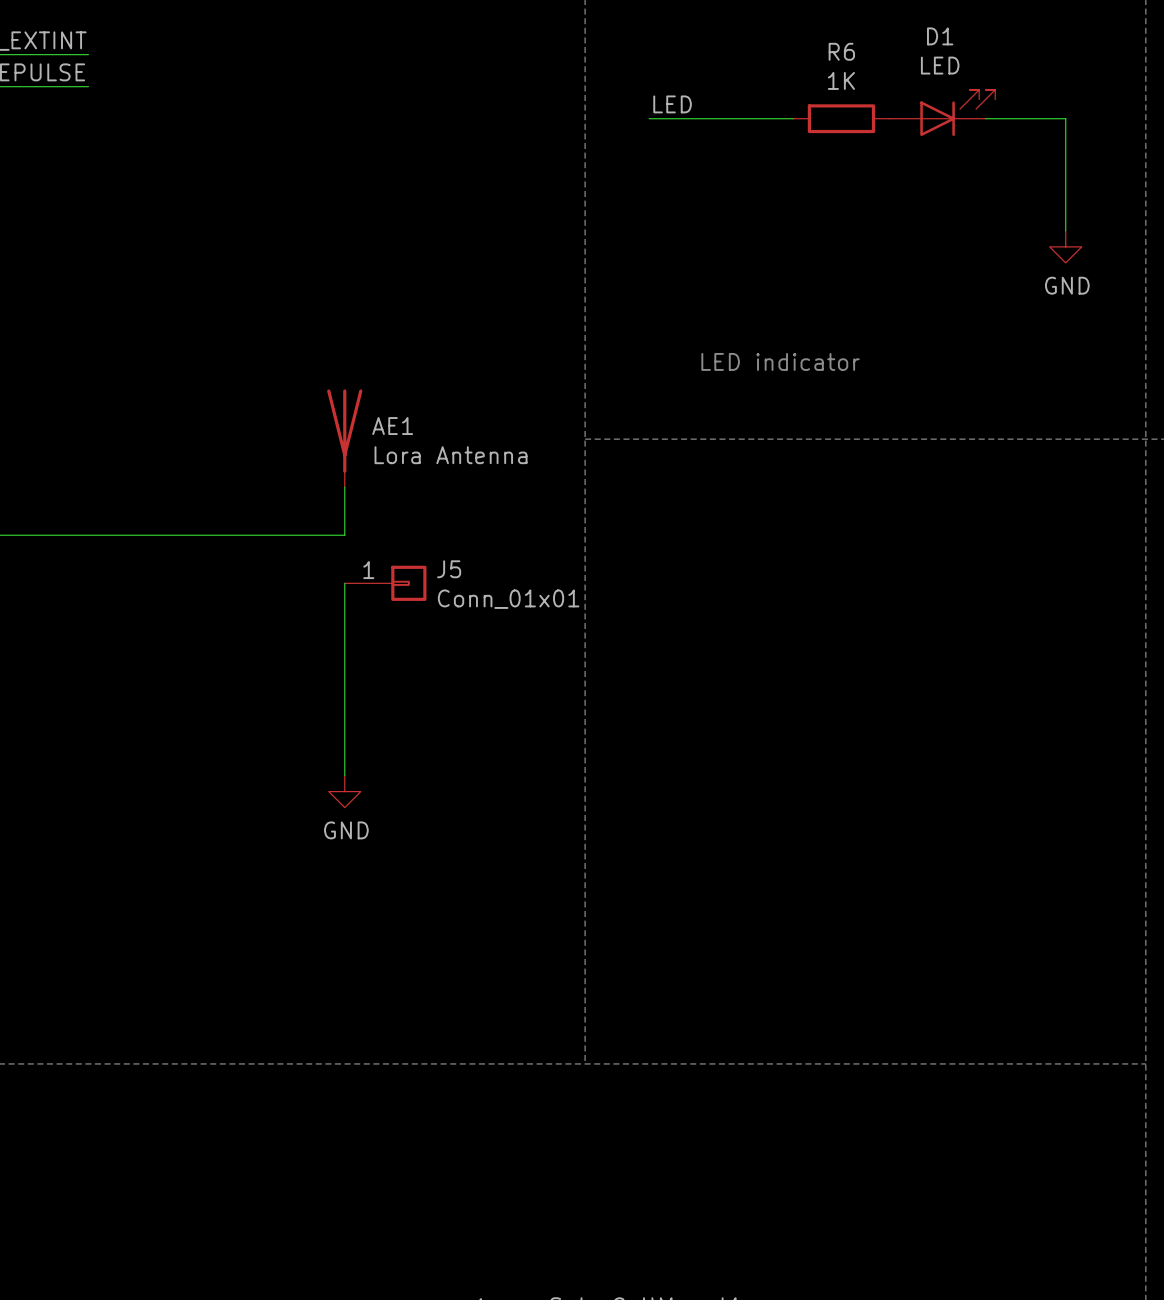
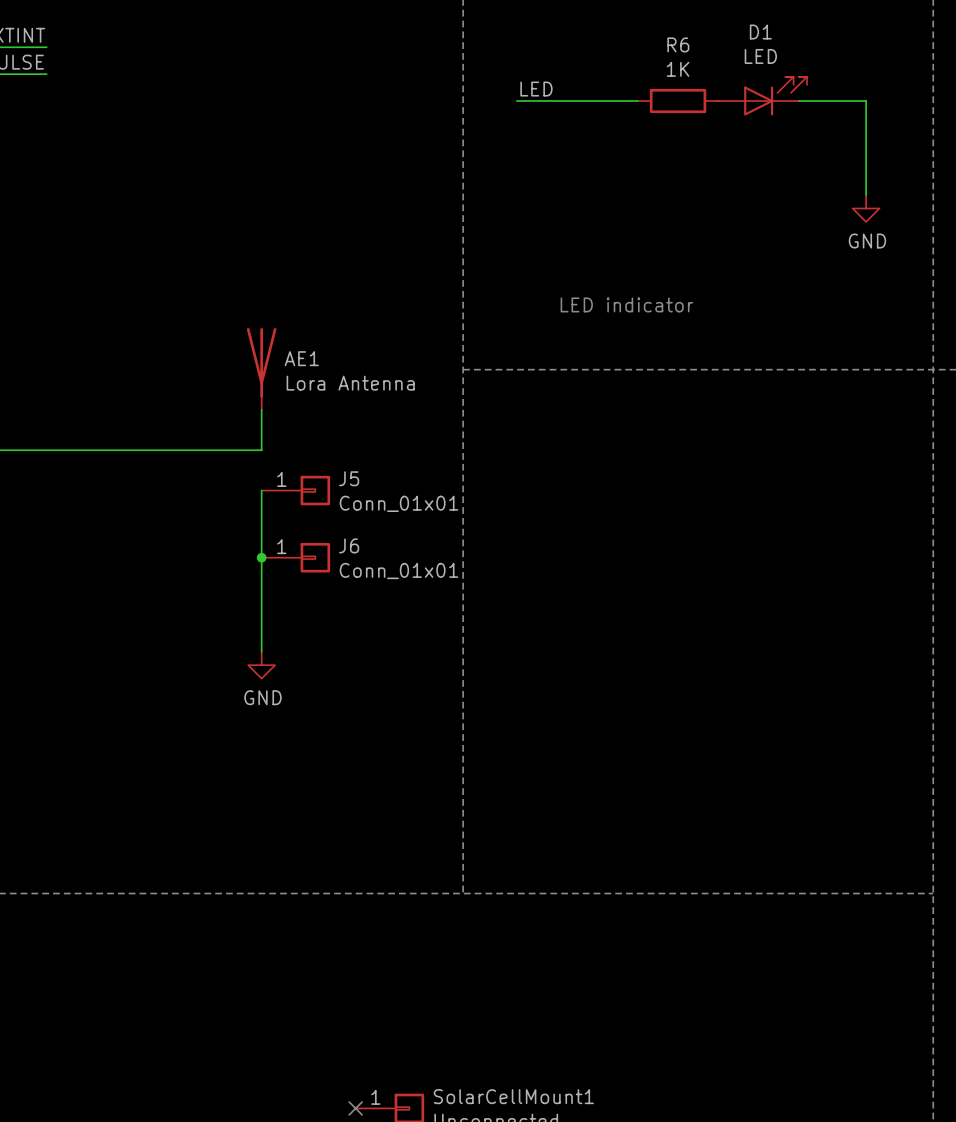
junction: none -> (261, 557)
J6: none -> Conn_01x01 (295, 557)

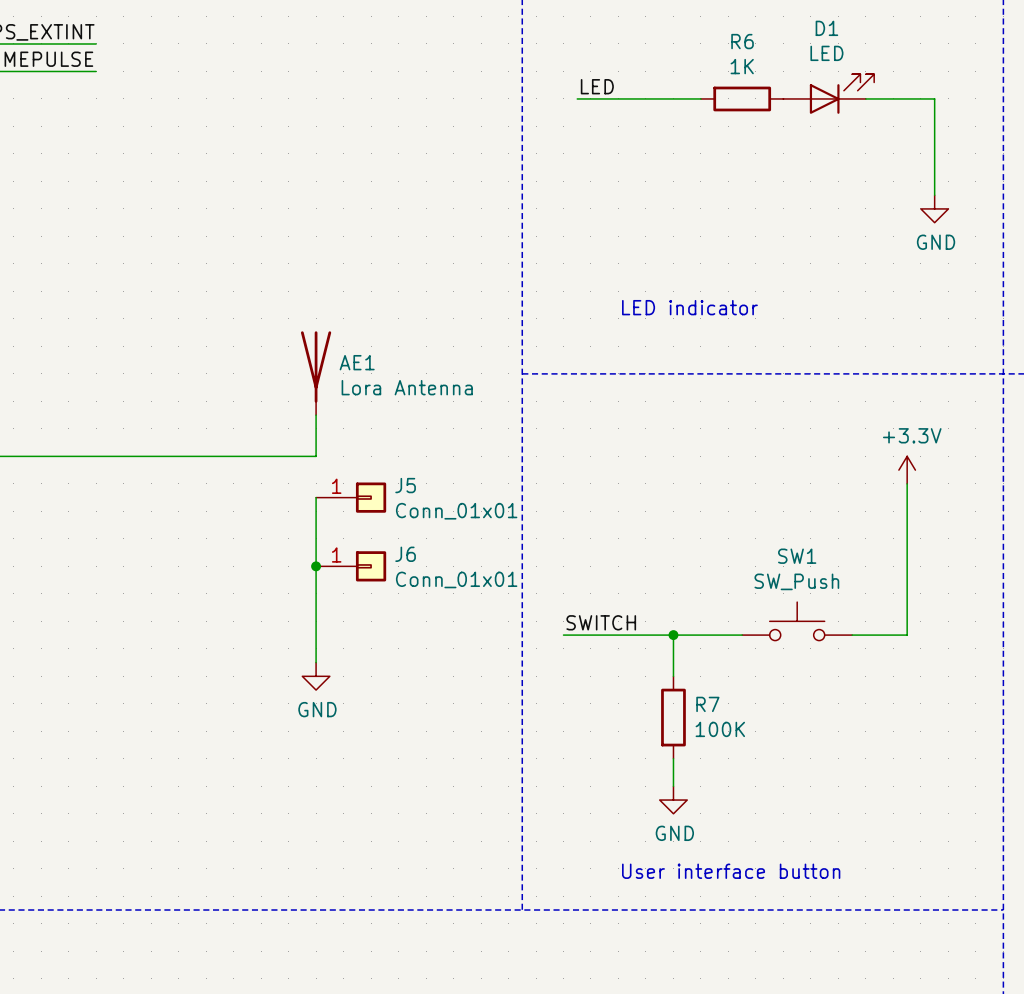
power symbol: none -> +3.3V (907, 470)
wire: none -> (907, 483) (907, 635) (852, 635)
SW1: none -> SW_Push (797, 621)
label: none -> SWITCH (601, 622)
wire: none -> (563, 635) (742, 635)
wire: none -> (673, 635) (673, 676)
junction: none -> (673, 635)
R7: none -> 100K (673, 717)
wire: none -> (673, 758) (673, 786)
power symbol: none -> GND (673, 800)
text: none -> User interface button (731, 871)

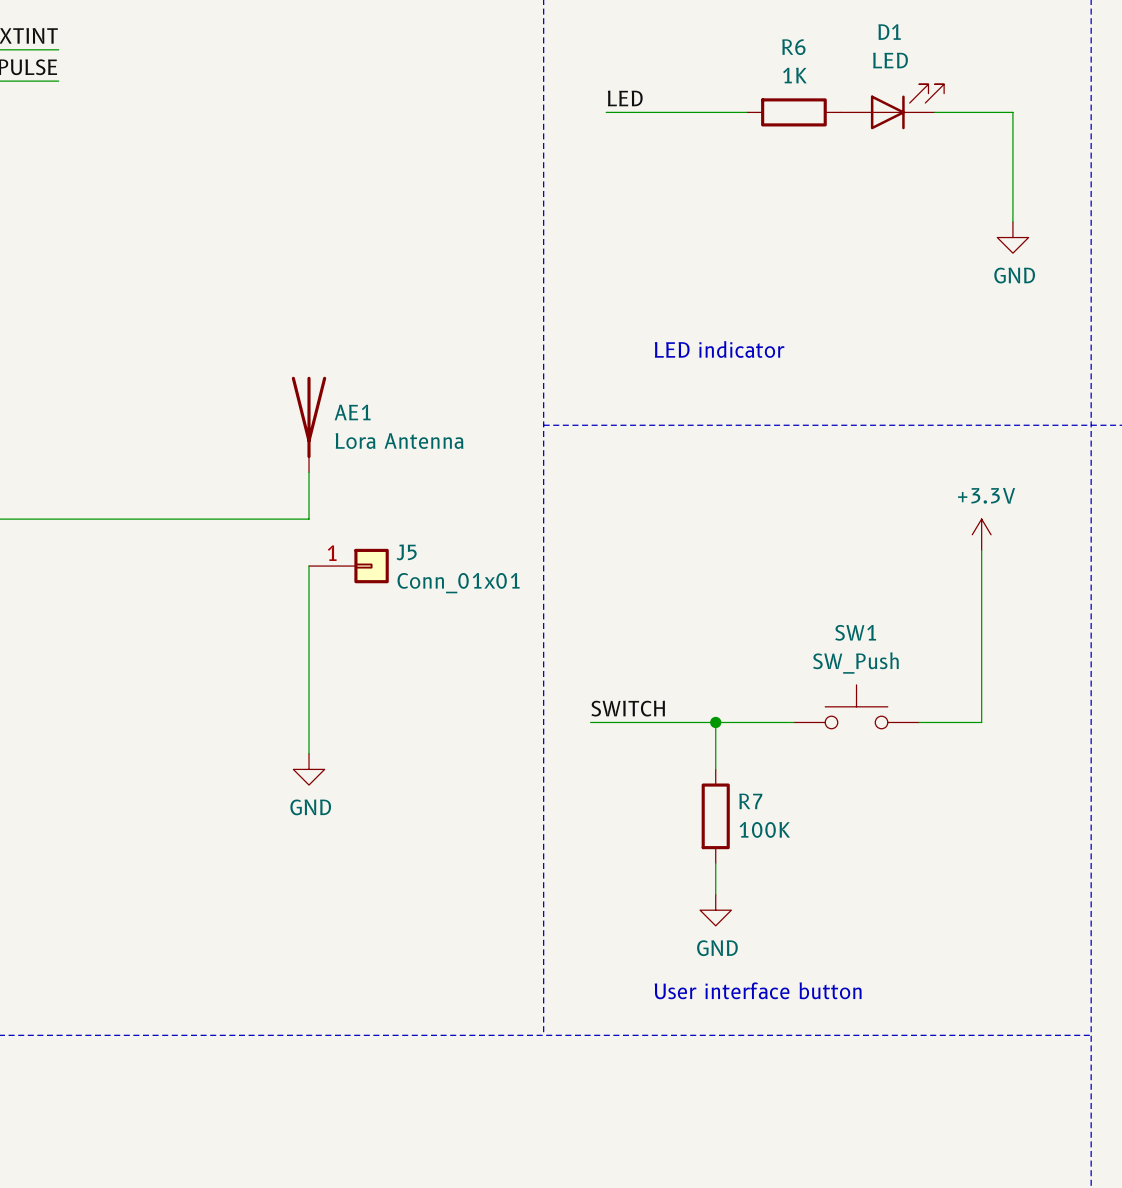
junction: (316, 566) -> none
J6: Conn_01x01 (351, 566) -> none

